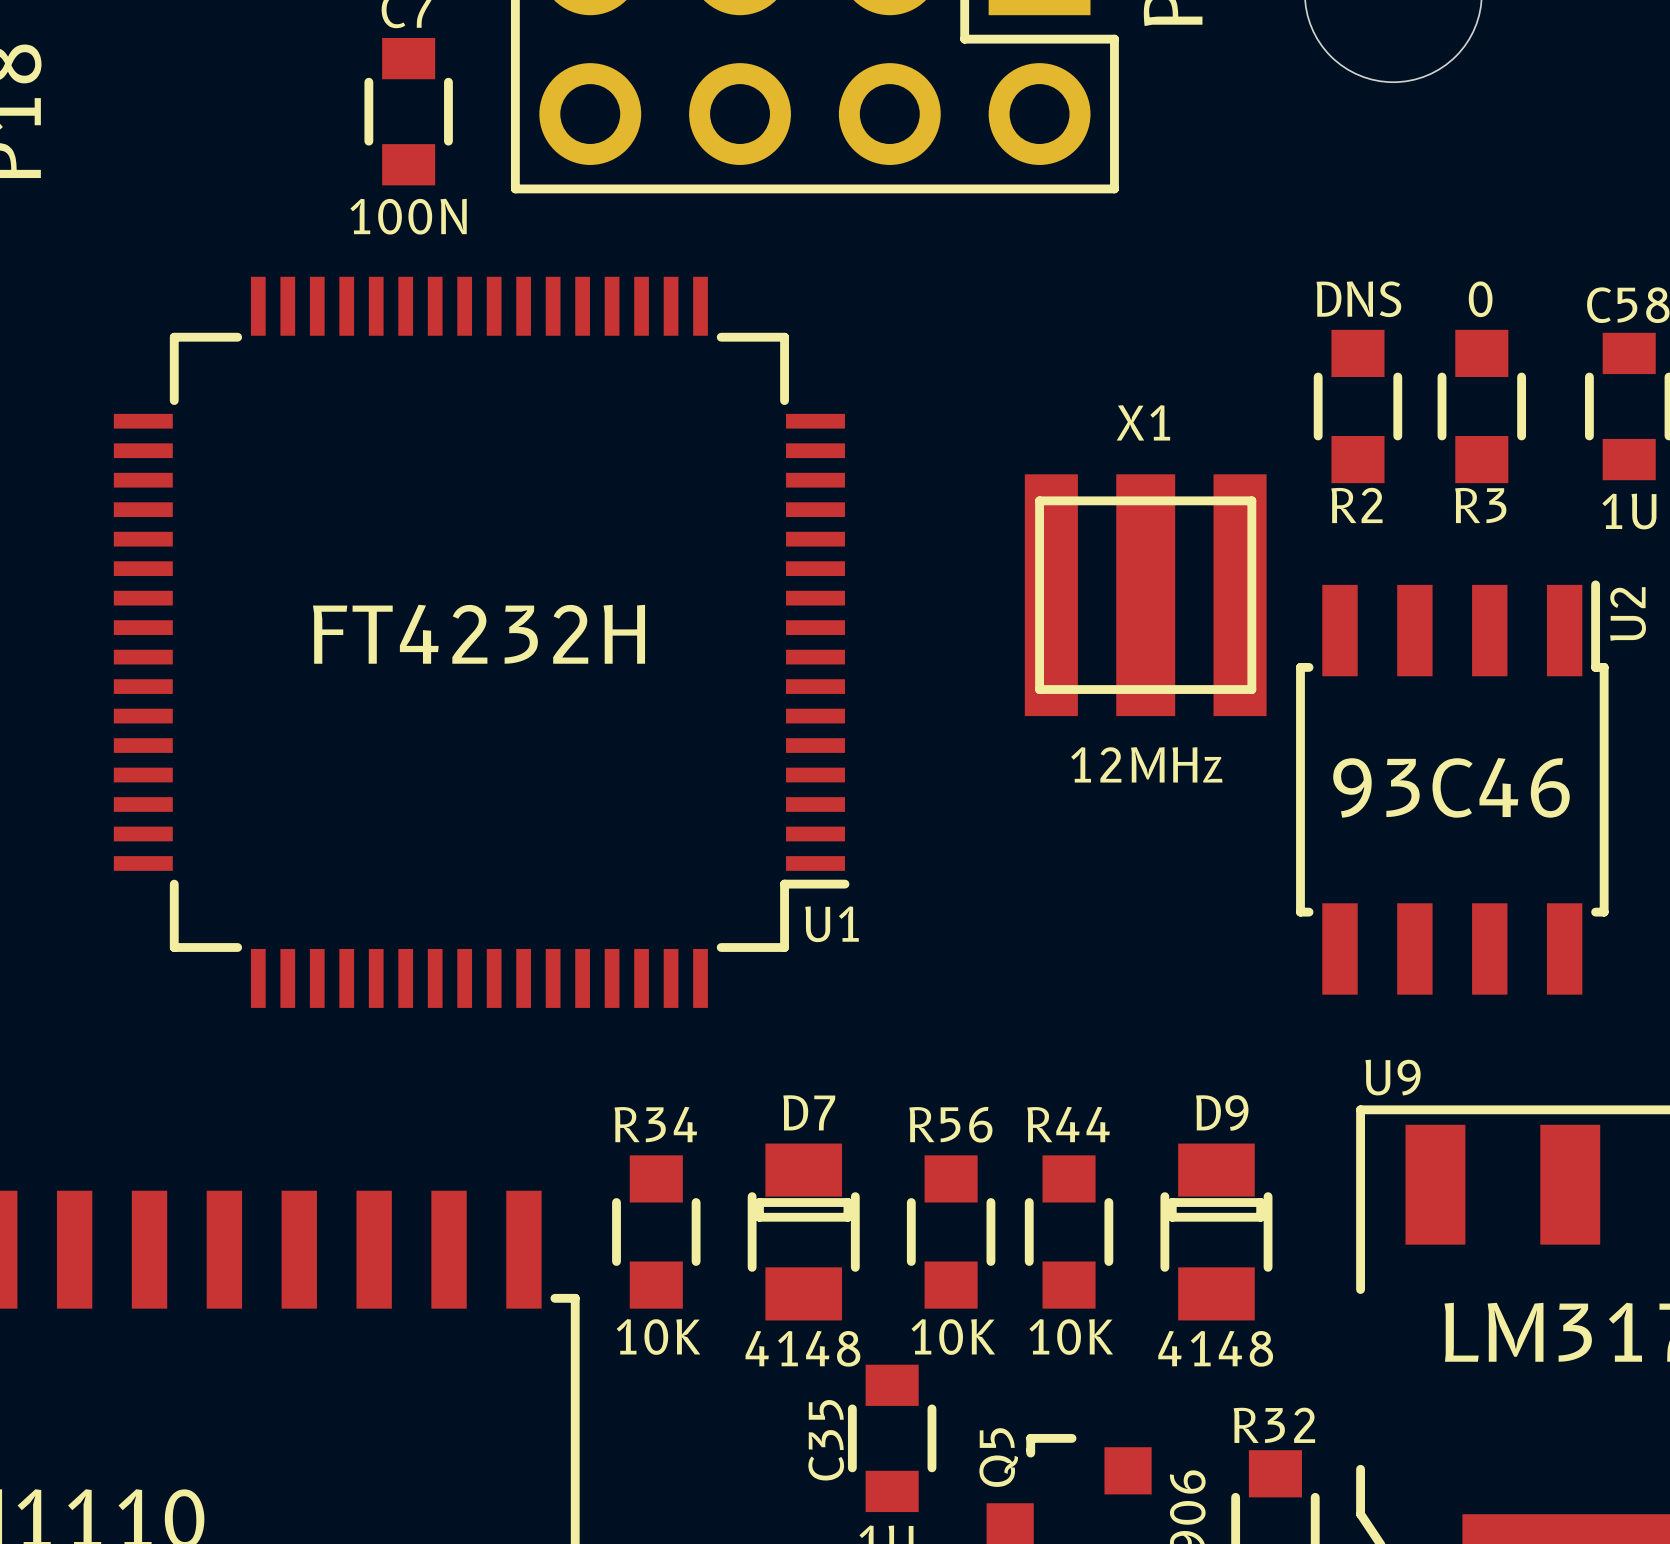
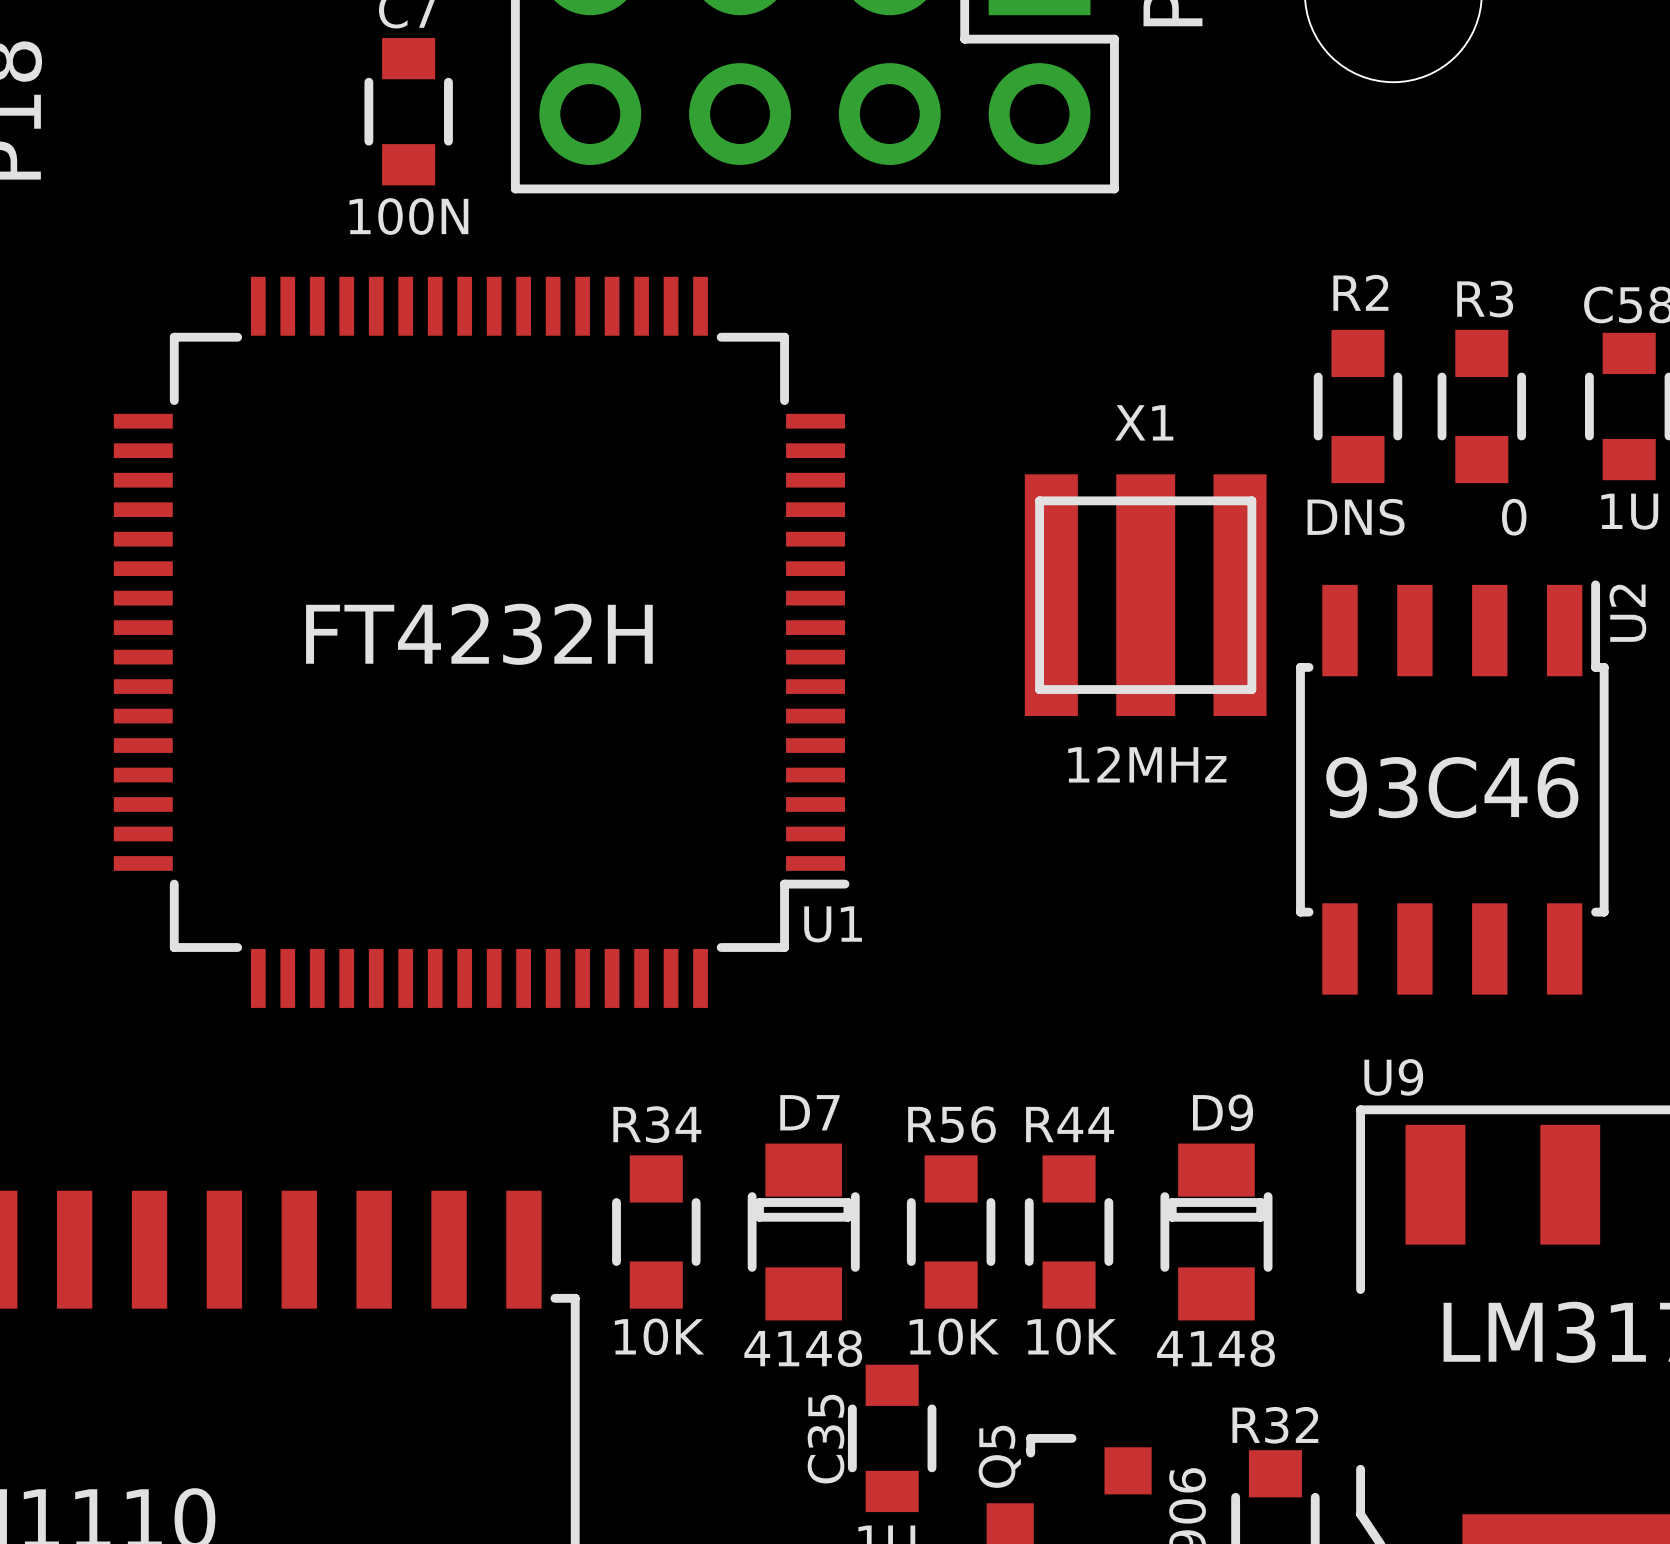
R2 value position: DNS (1358, 299) -> DNS (1356, 517)
R3 value position: 0 (1480, 299) -> 0 (1514, 517)
R2 name position: R2 (1356, 505) -> R2 (1360, 292)
R3 name position: R3 (1480, 505) -> R3 (1485, 299)

